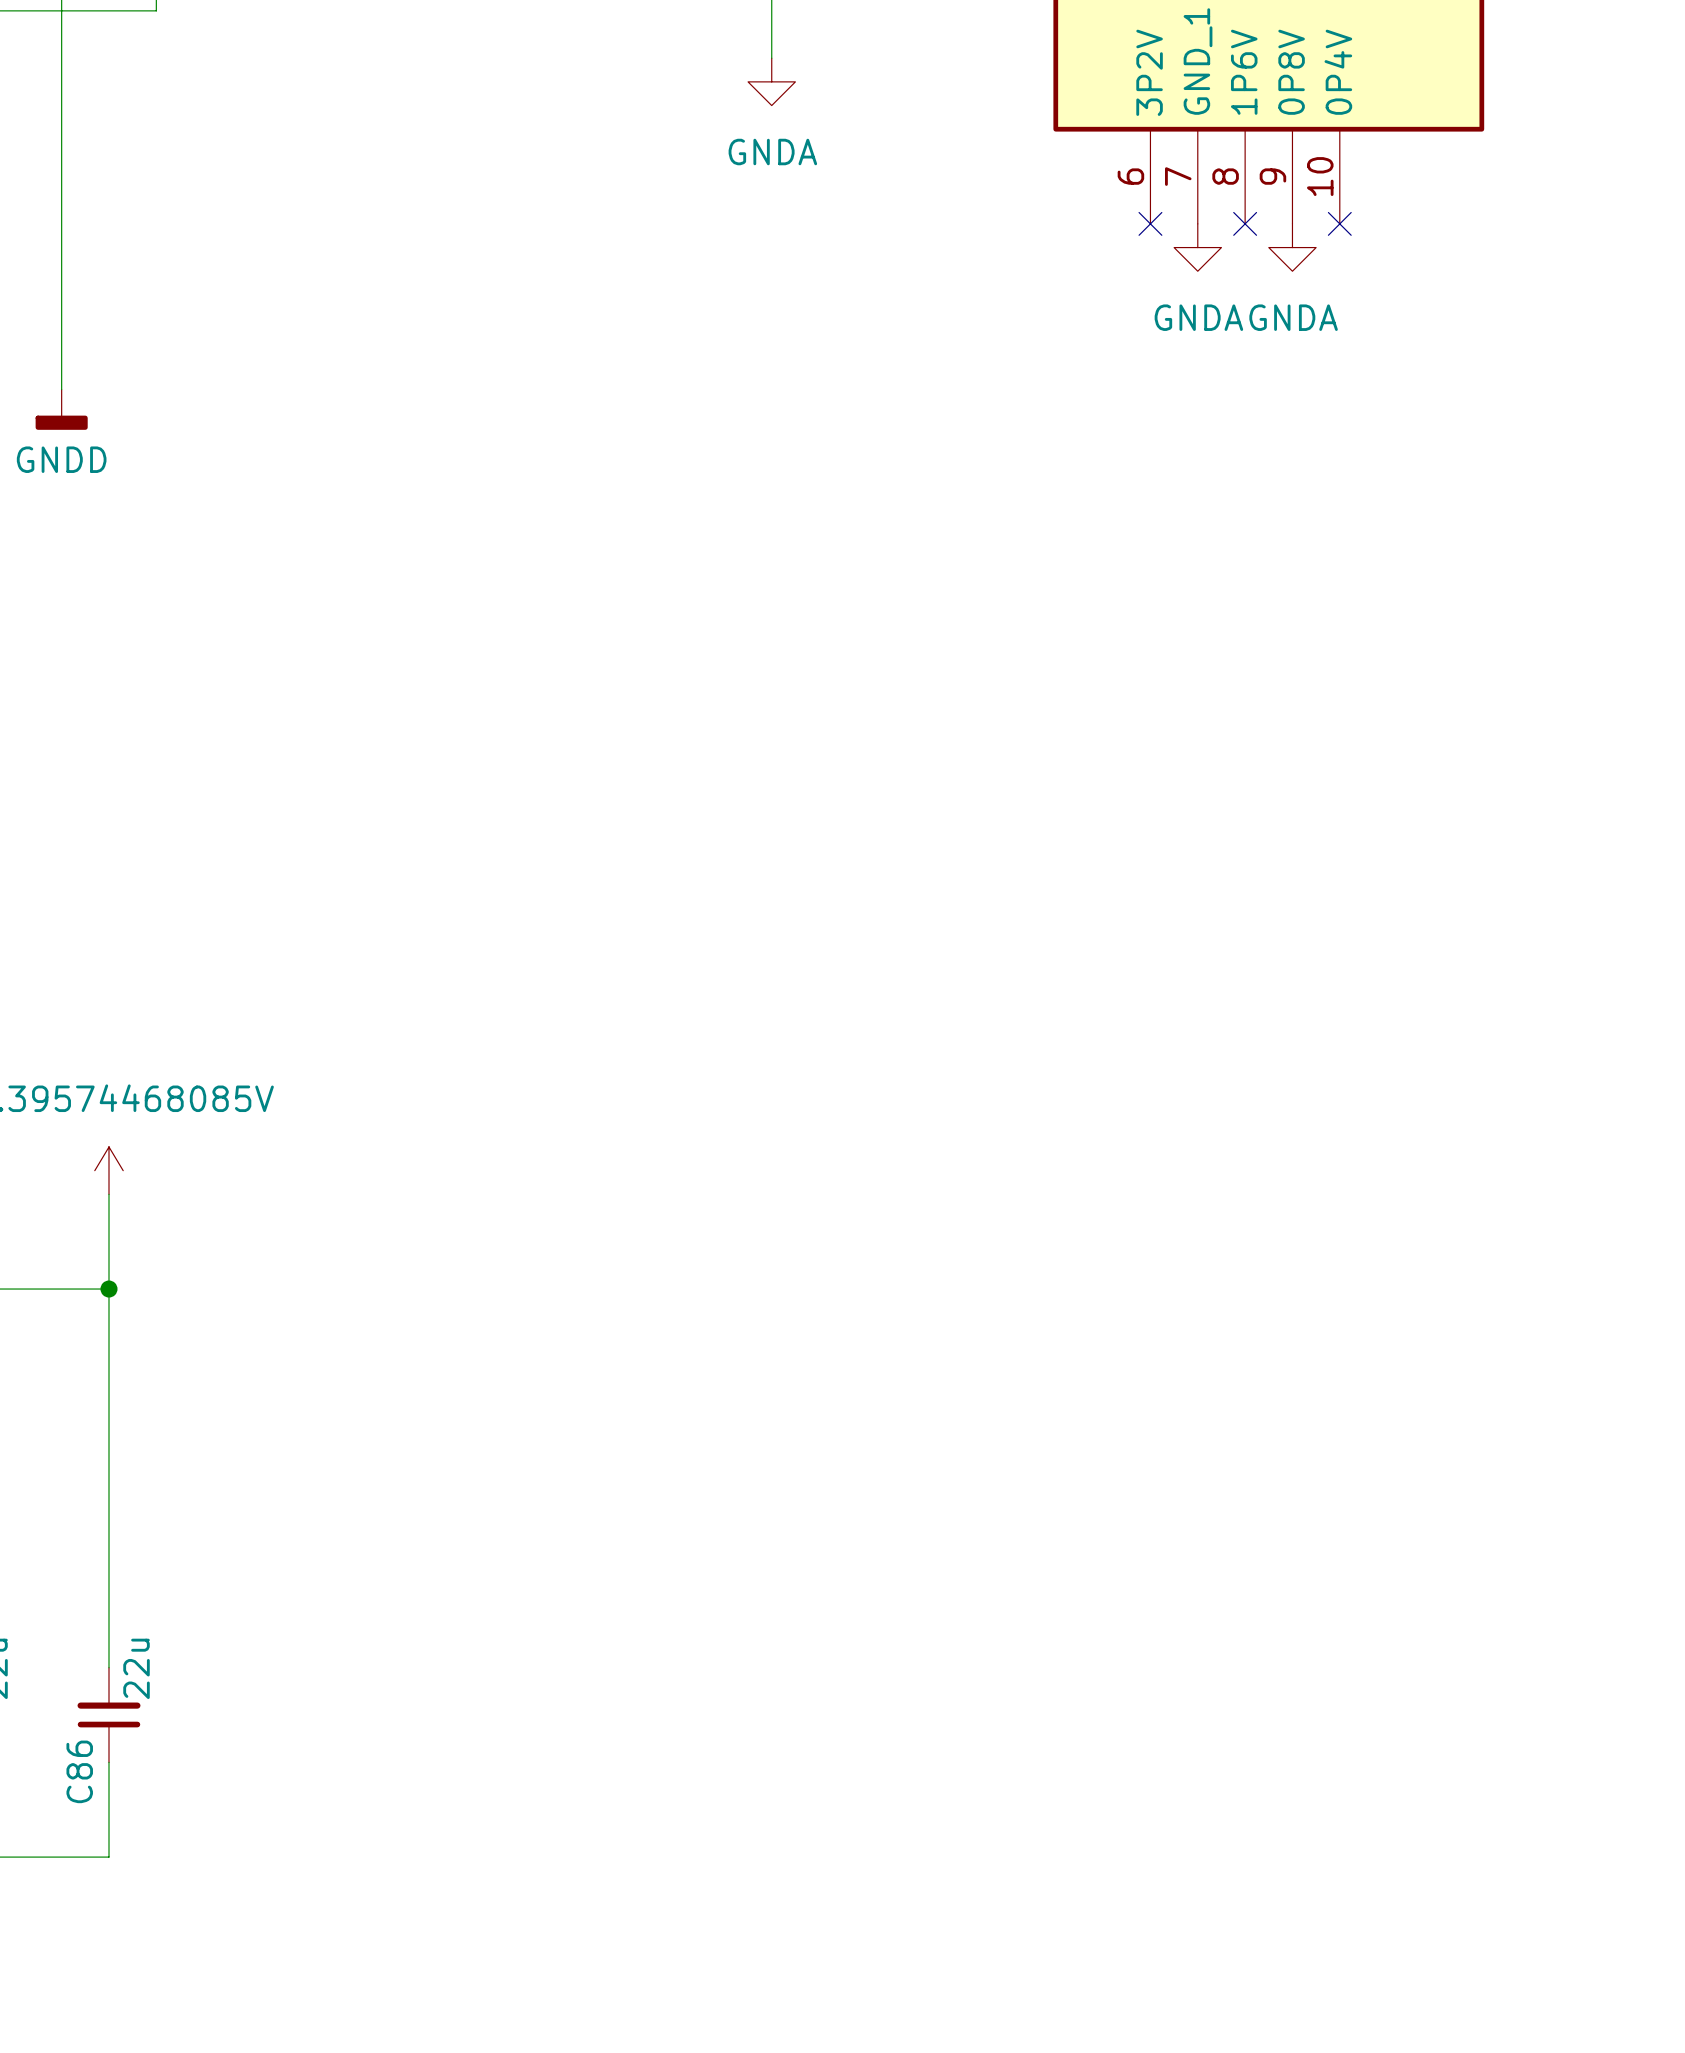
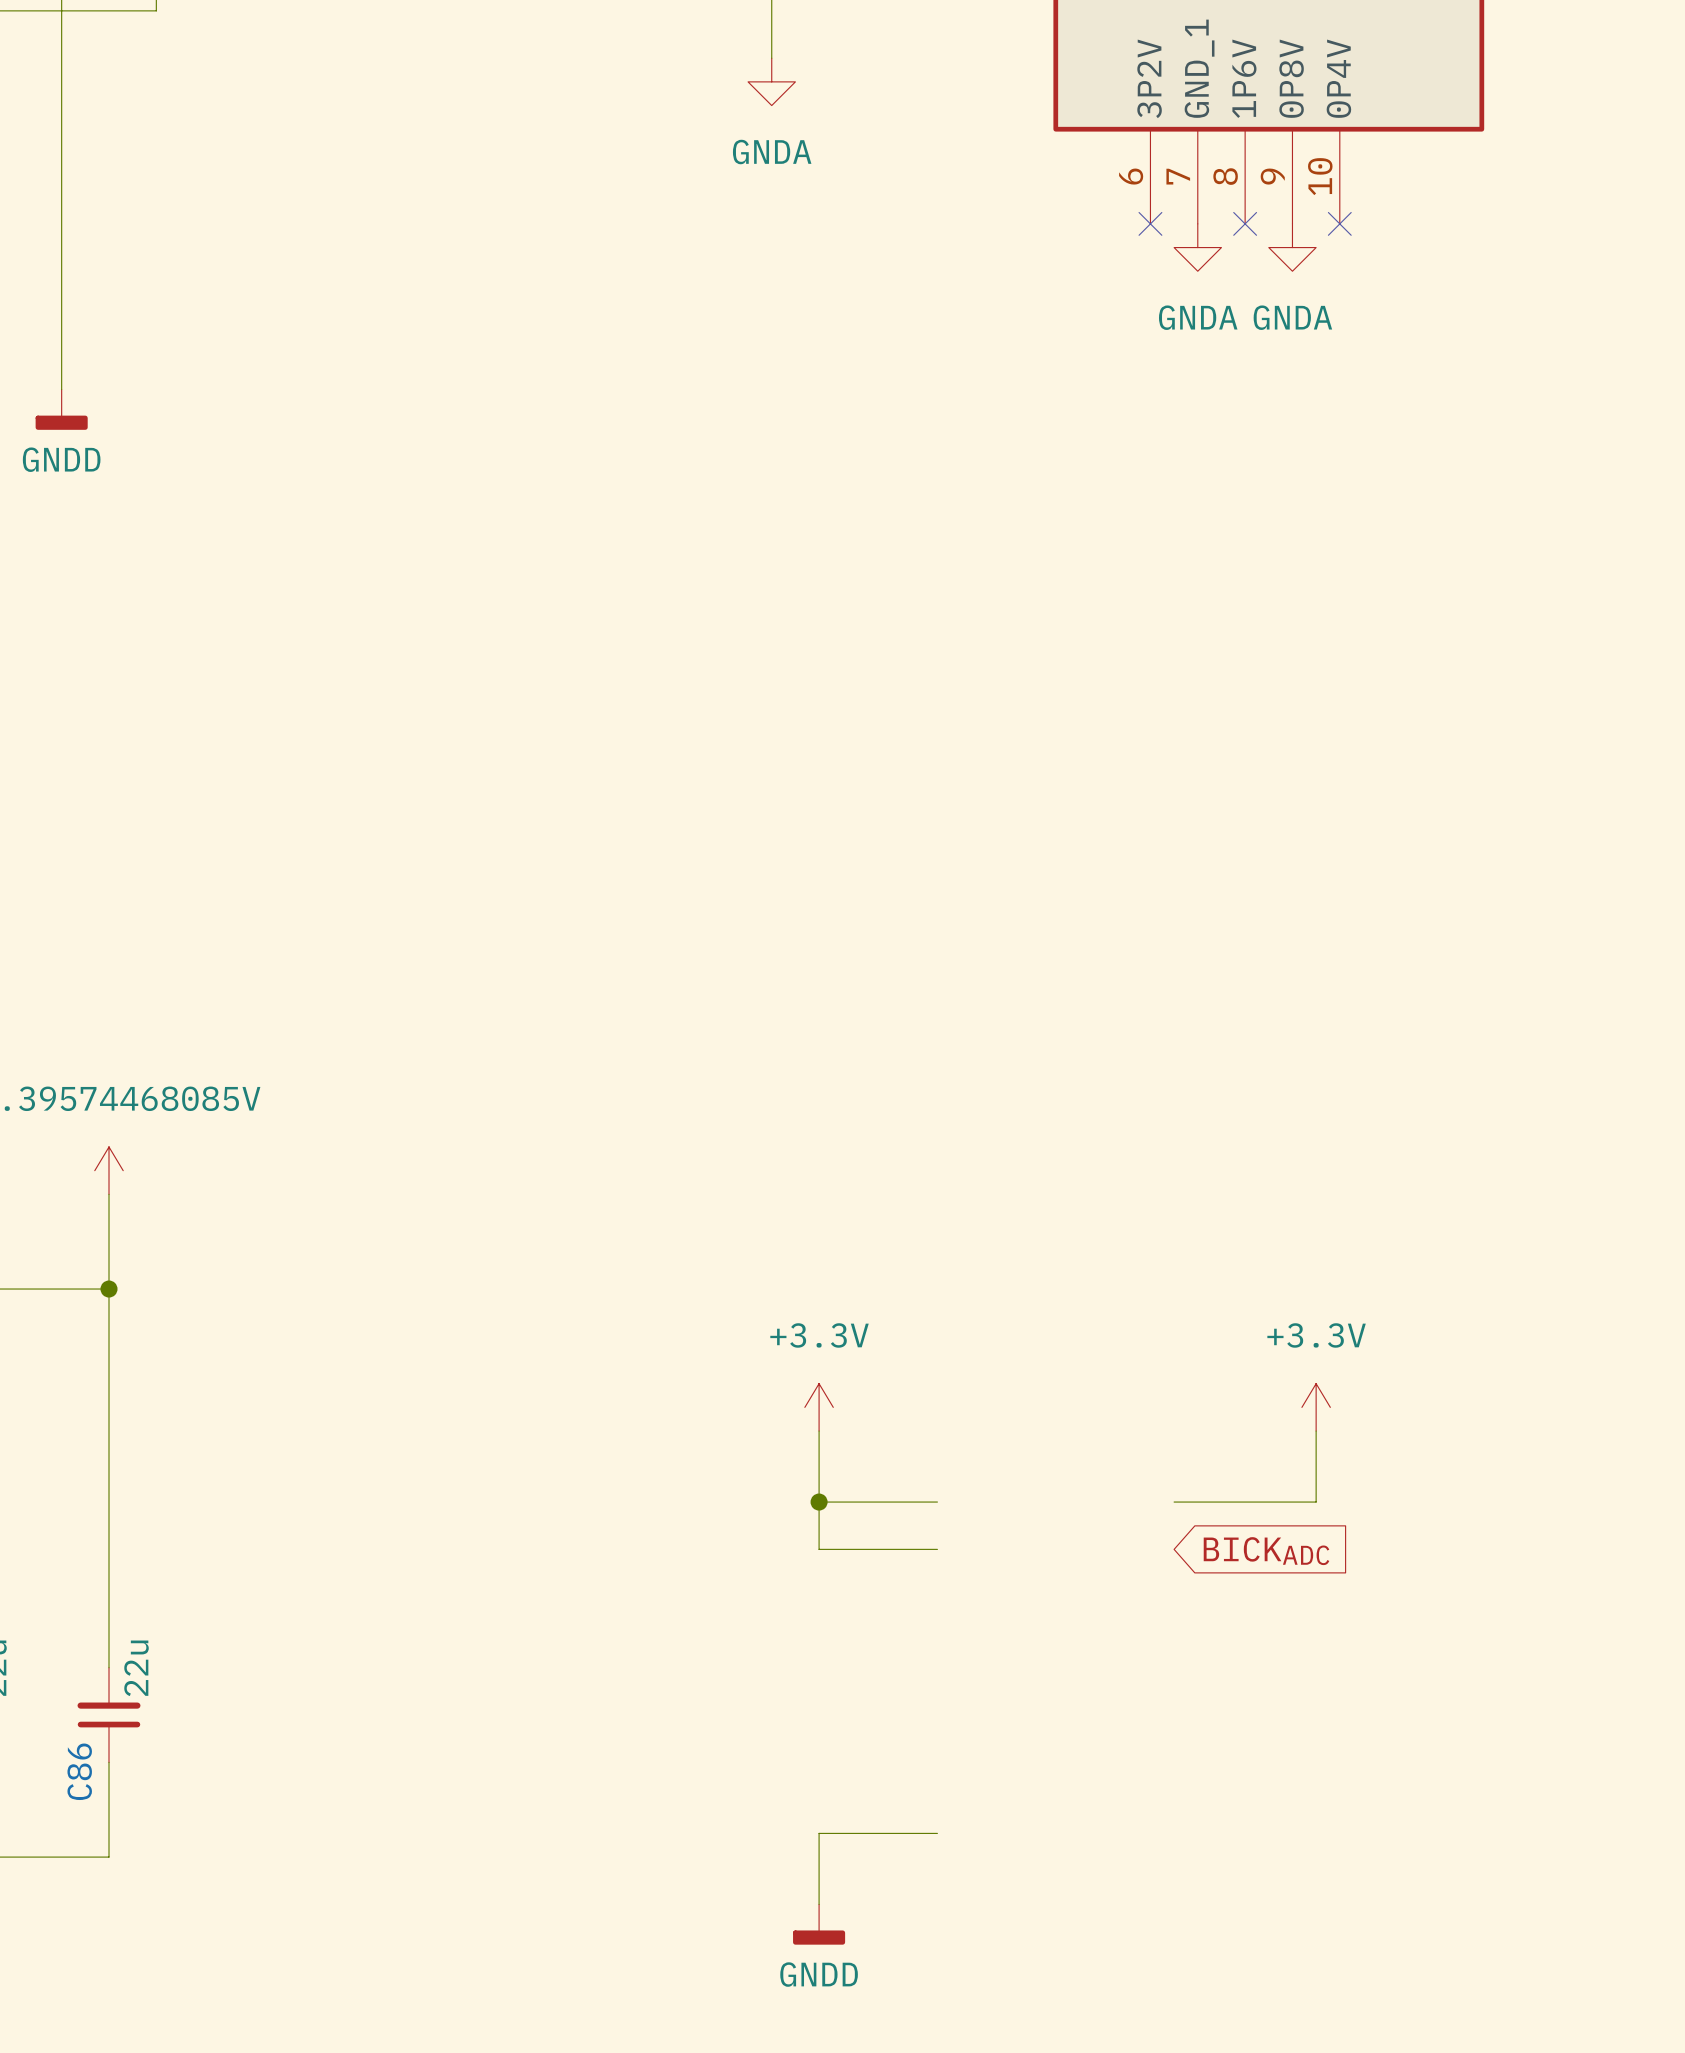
power symbol: none -> +3.3V (819, 1407)
power symbol: none -> +3.3V (1316, 1407)
wire: none -> (819, 1431) (819, 1549) (937, 1549)
wire: none -> (1316, 1431) (1316, 1502) (1174, 1502)
wire: none -> (819, 1502) (937, 1502)
junction: none -> (819, 1502)
global label: none -> BICKADC (1266, 1551)
wire: none -> (937, 1833) (819, 1833) (819, 1904)
power symbol: none -> GNDD (819, 1924)

